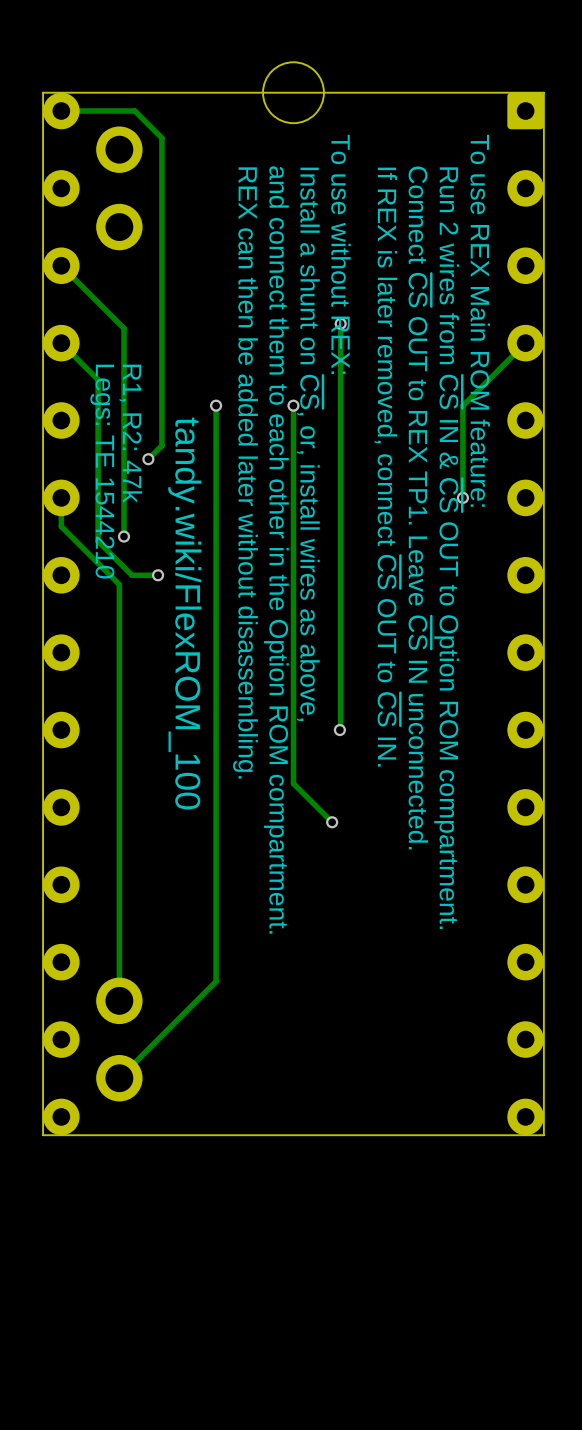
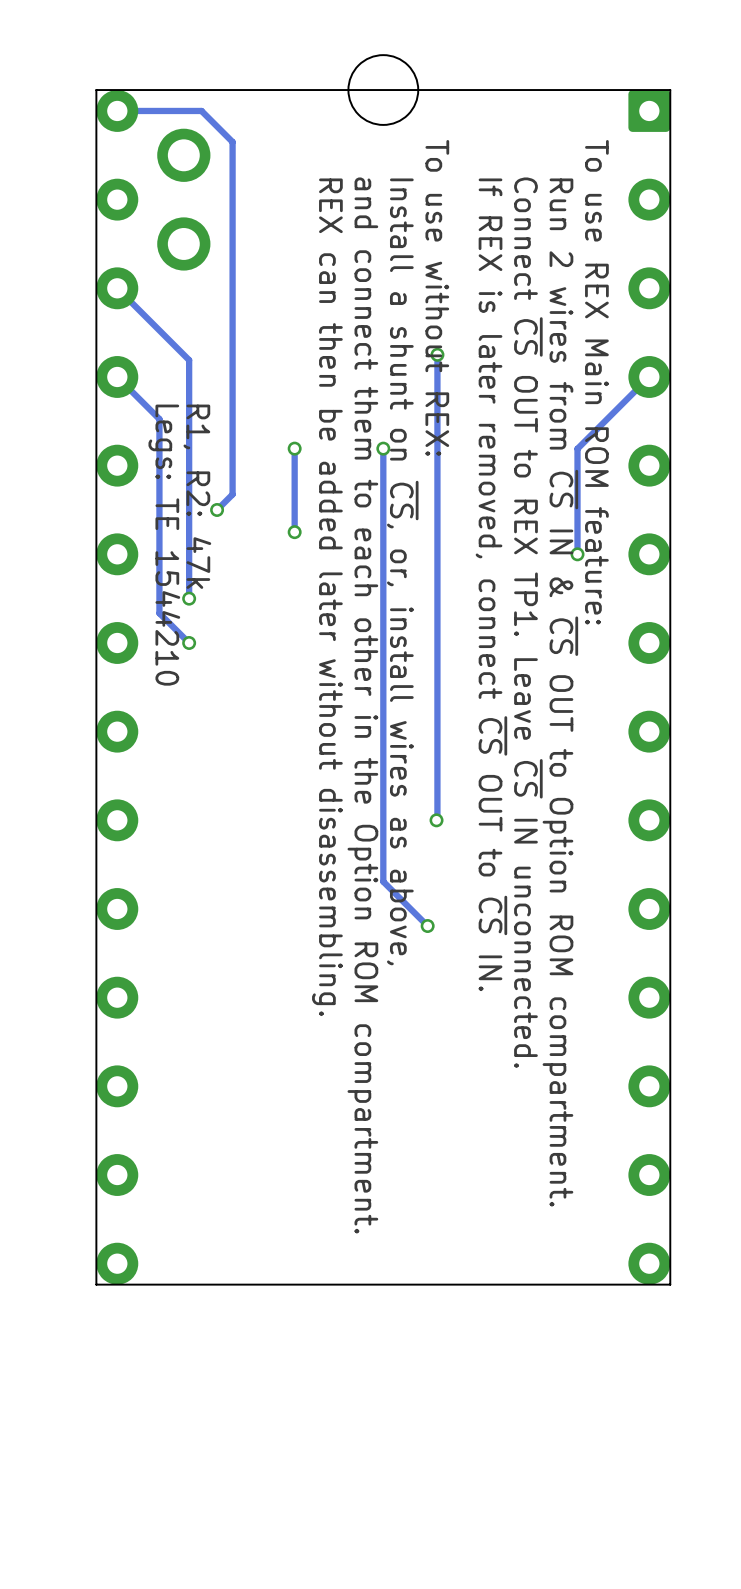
track: (216, 478) (216, 981) (119, 1078) -> none
via: none -> (294, 532)
track: (61, 497) (61, 526) (119, 584) (119, 1000) -> none
track: (98, 541) (132, 575) (158, 575) -> (159, 604) (159, 613) (189, 642)
via position: (158, 575) -> (189, 642)
text: tandy.wiki/FlexROM_100 (184, 613) -> none
part: (119, 1039) -> none

